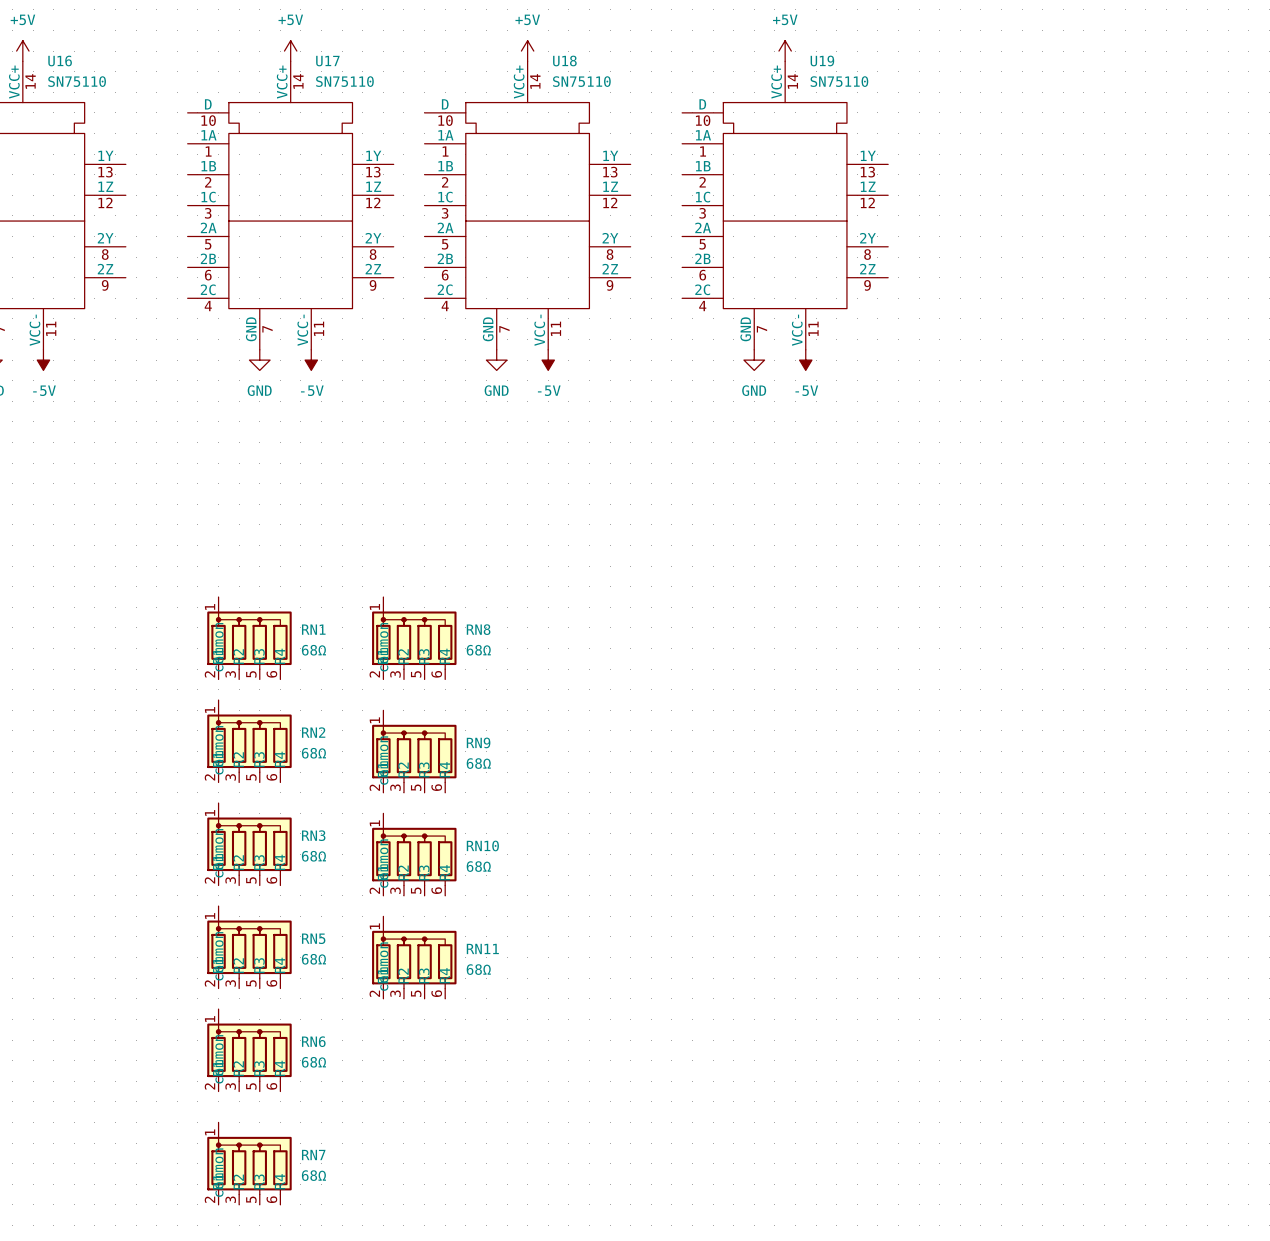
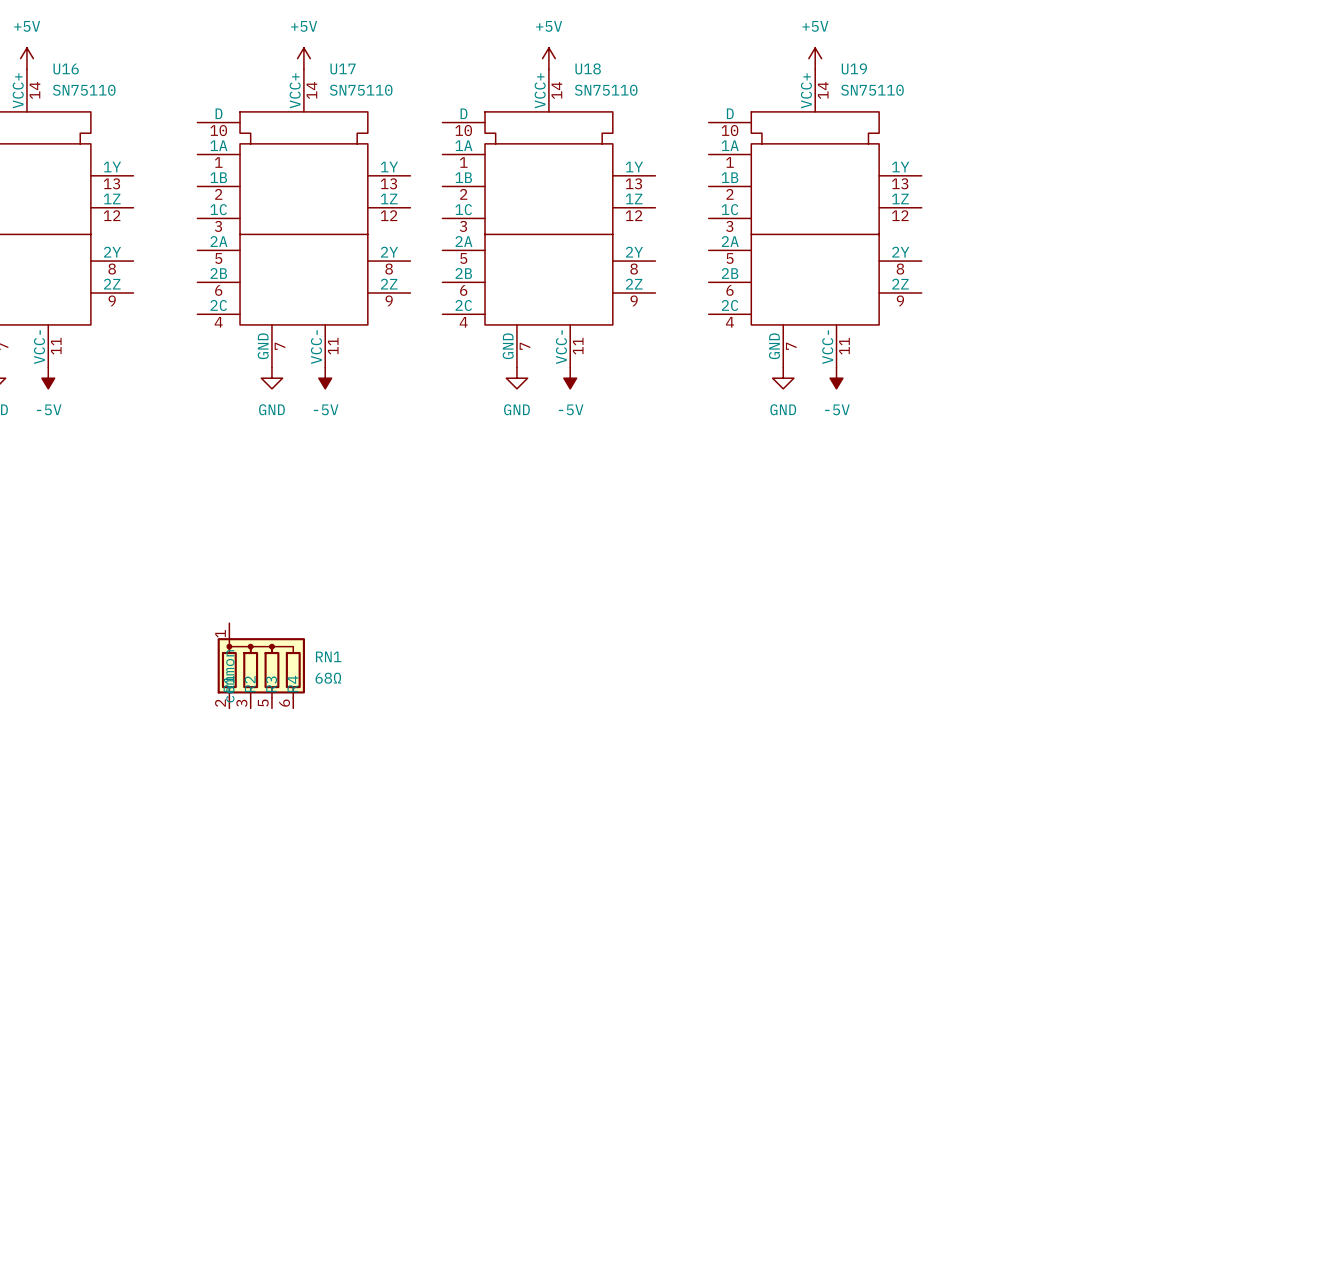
RN8: 68Ω (414, 638) -> none
RN2: 68Ω (249, 741) -> none
RN9: 68Ω (414, 751) -> none
RN3: 68Ω (249, 844) -> none
RN10: 68Ω (414, 854) -> none
RN5: 68Ω (249, 947) -> none
RN11: 68Ω (414, 957) -> none
RN6: 68Ω (249, 1050) -> none
RN7: 68Ω (249, 1163) -> none

